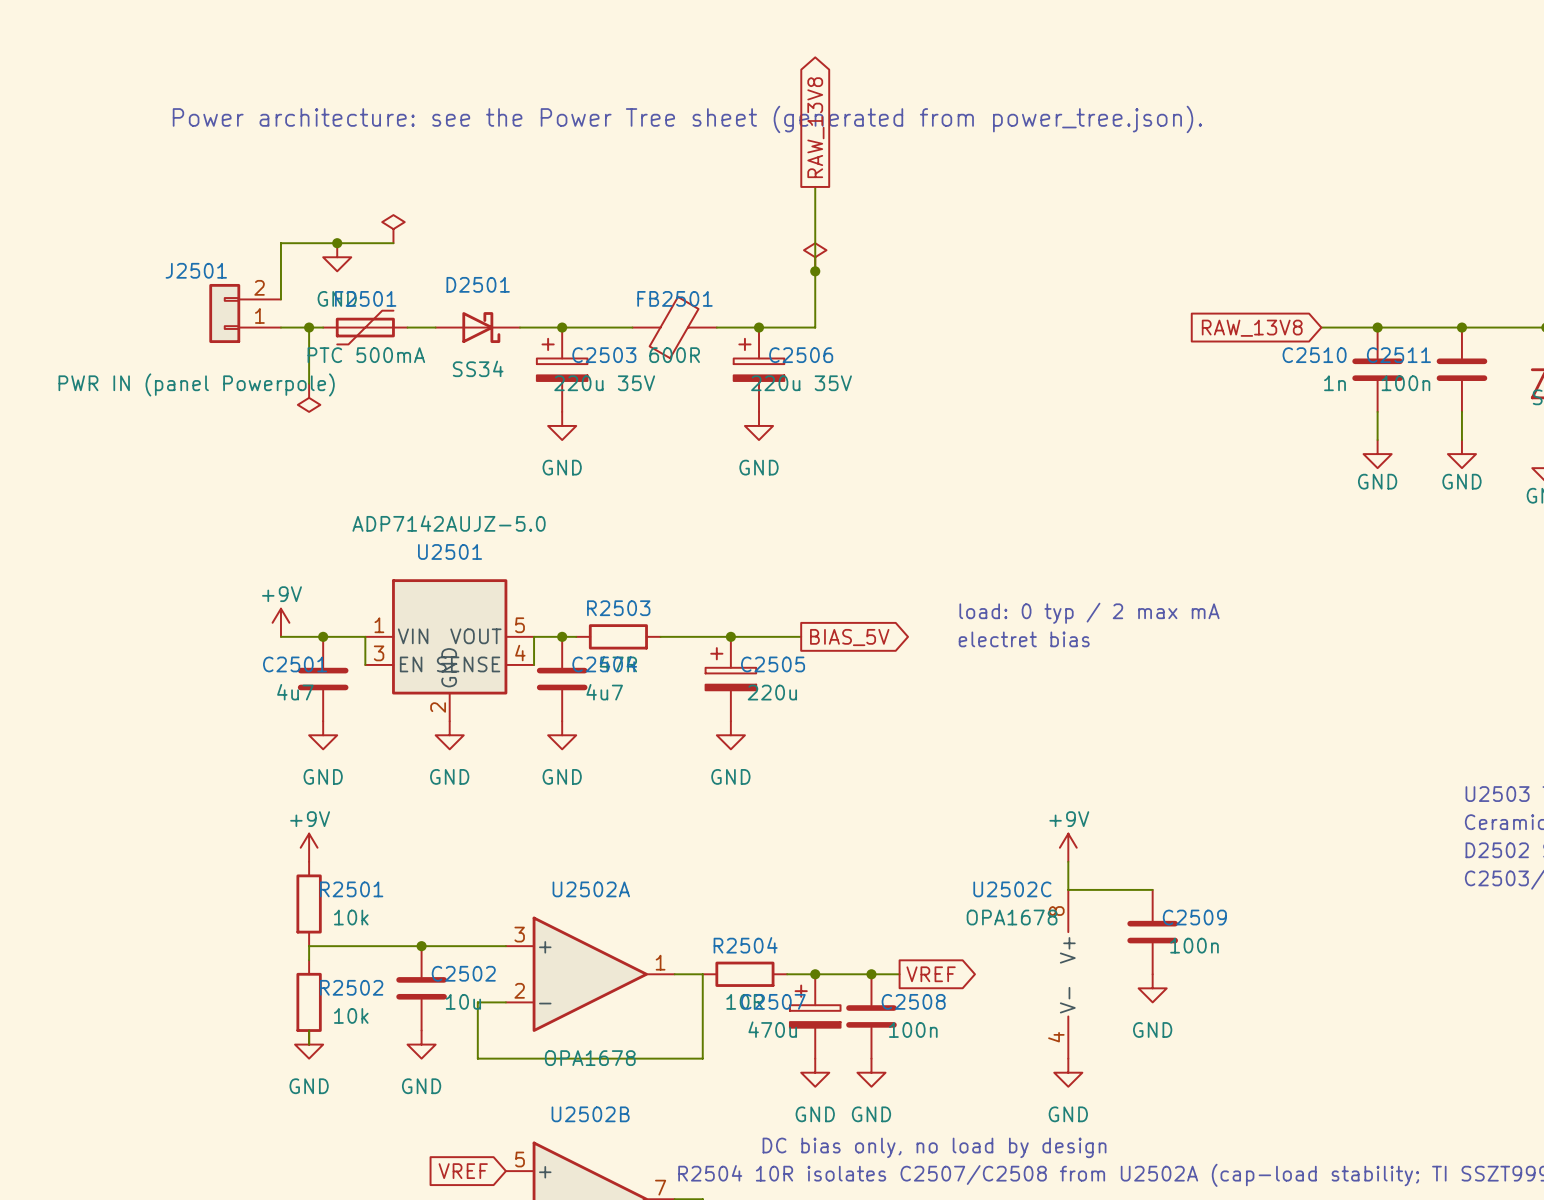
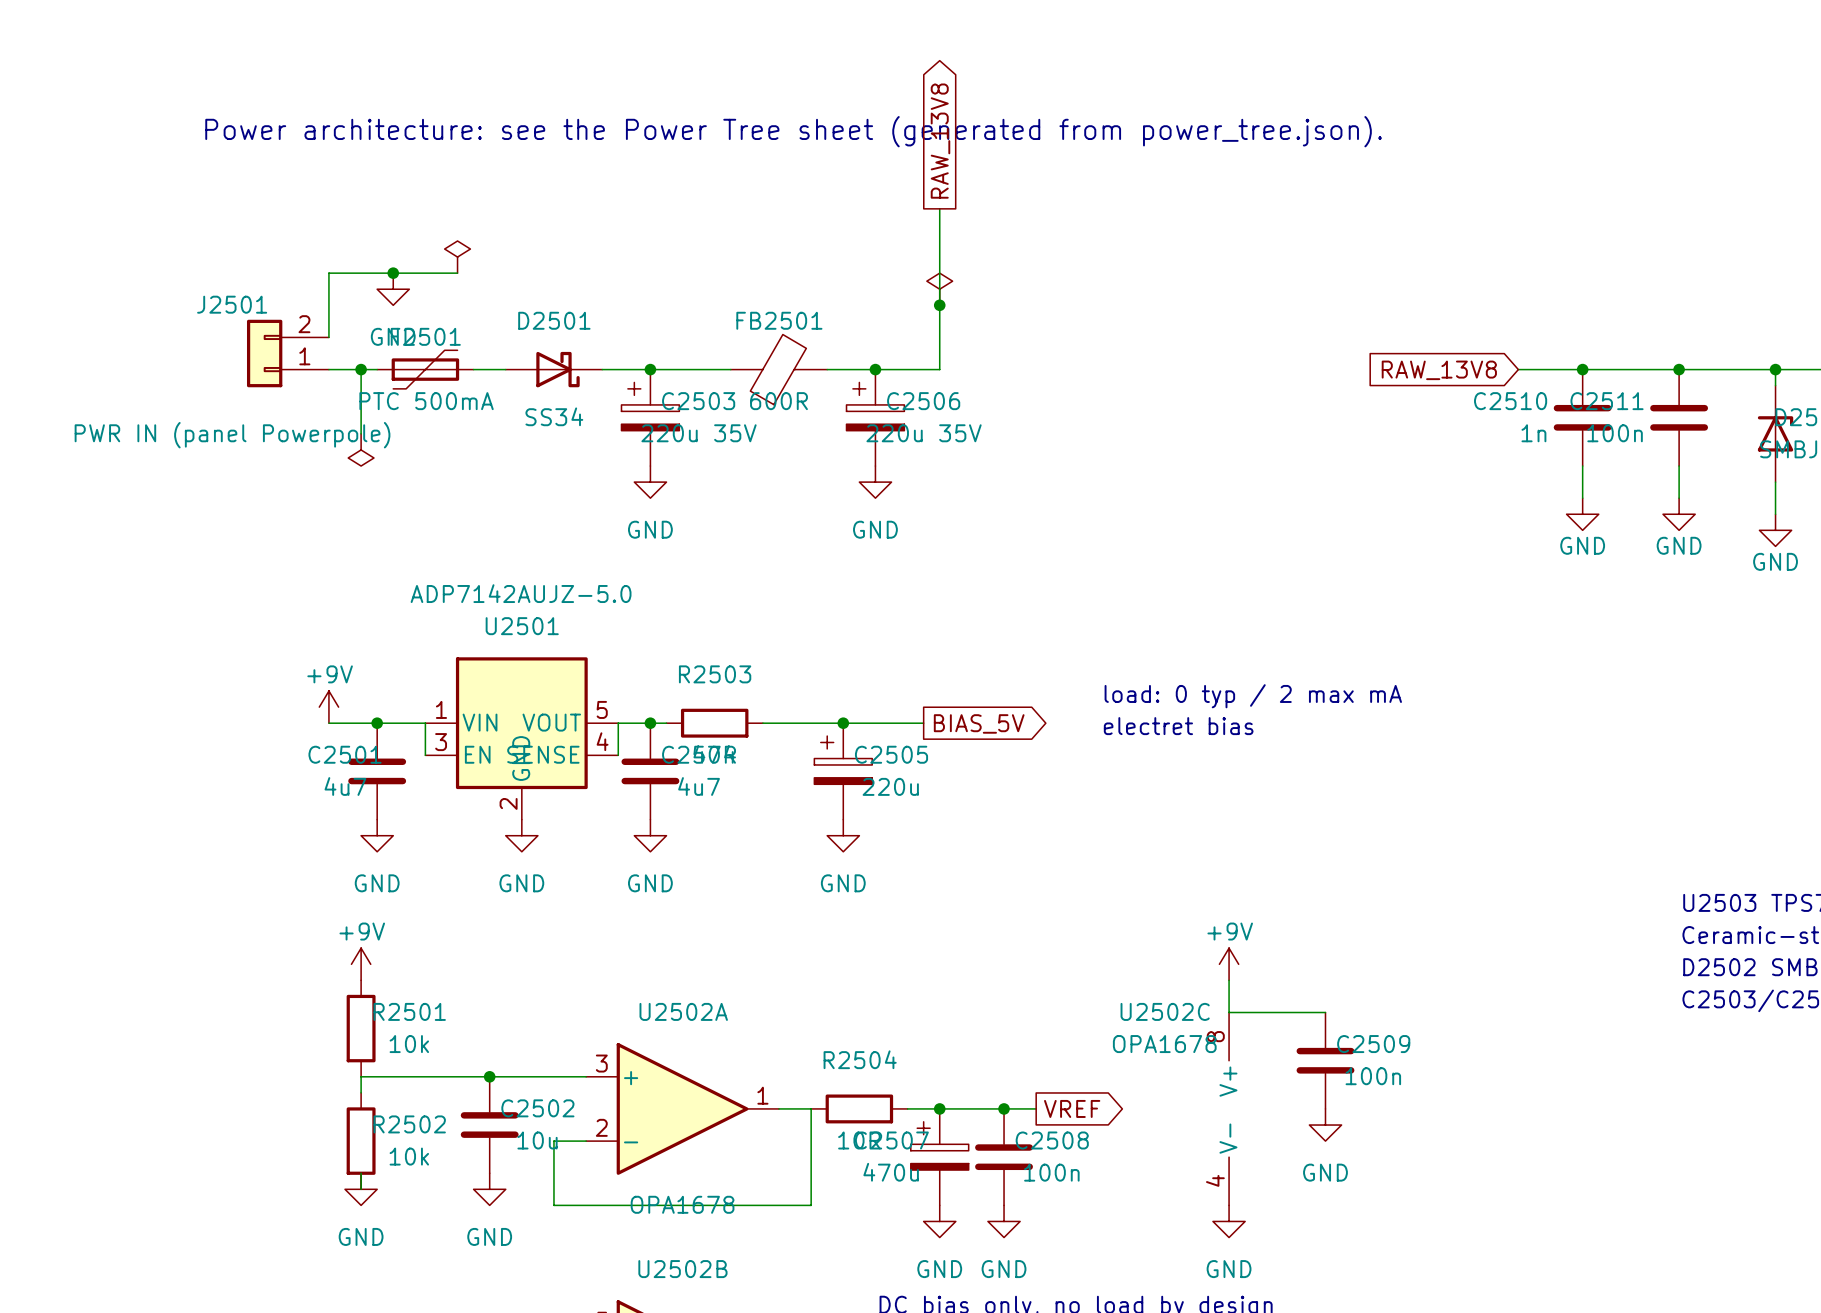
FB2501 name position: FB2501 (674, 298) -> FB2501 (779, 320)
R2503 name position: R2503 (618, 608) -> R2503 (715, 674)
R2504 name position: R2504 (745, 945) -> R2504 (860, 1059)

